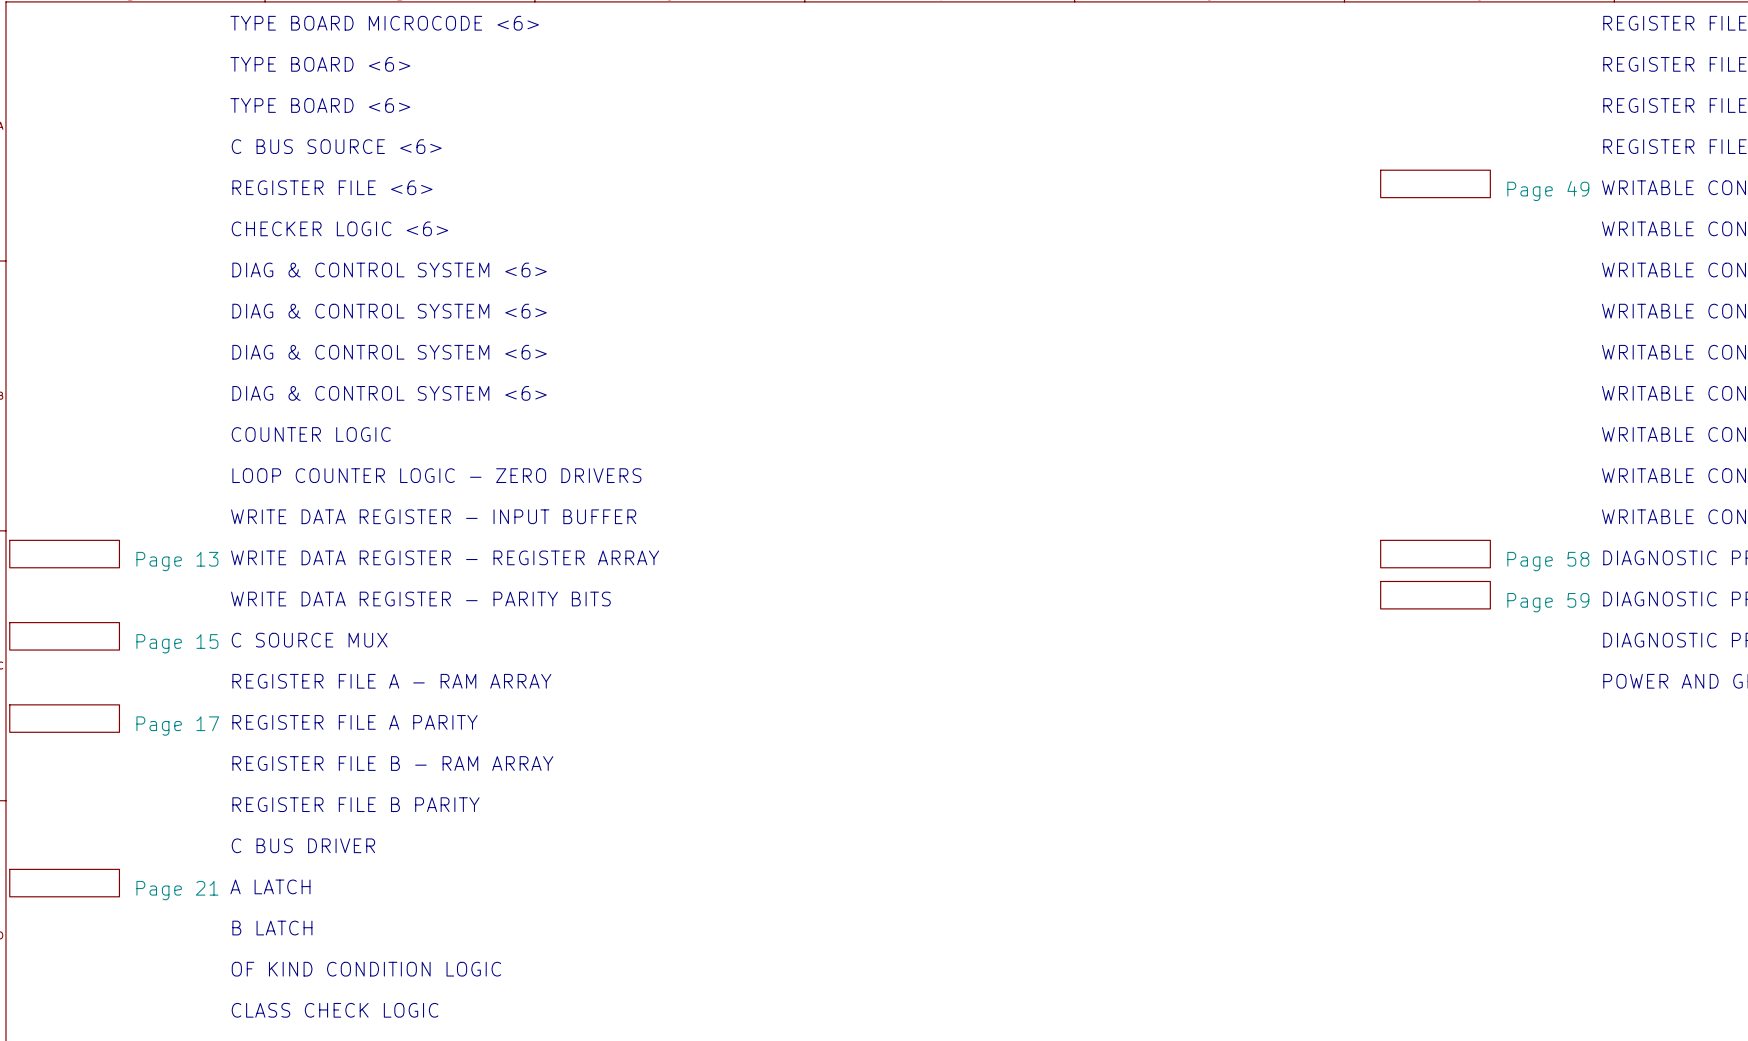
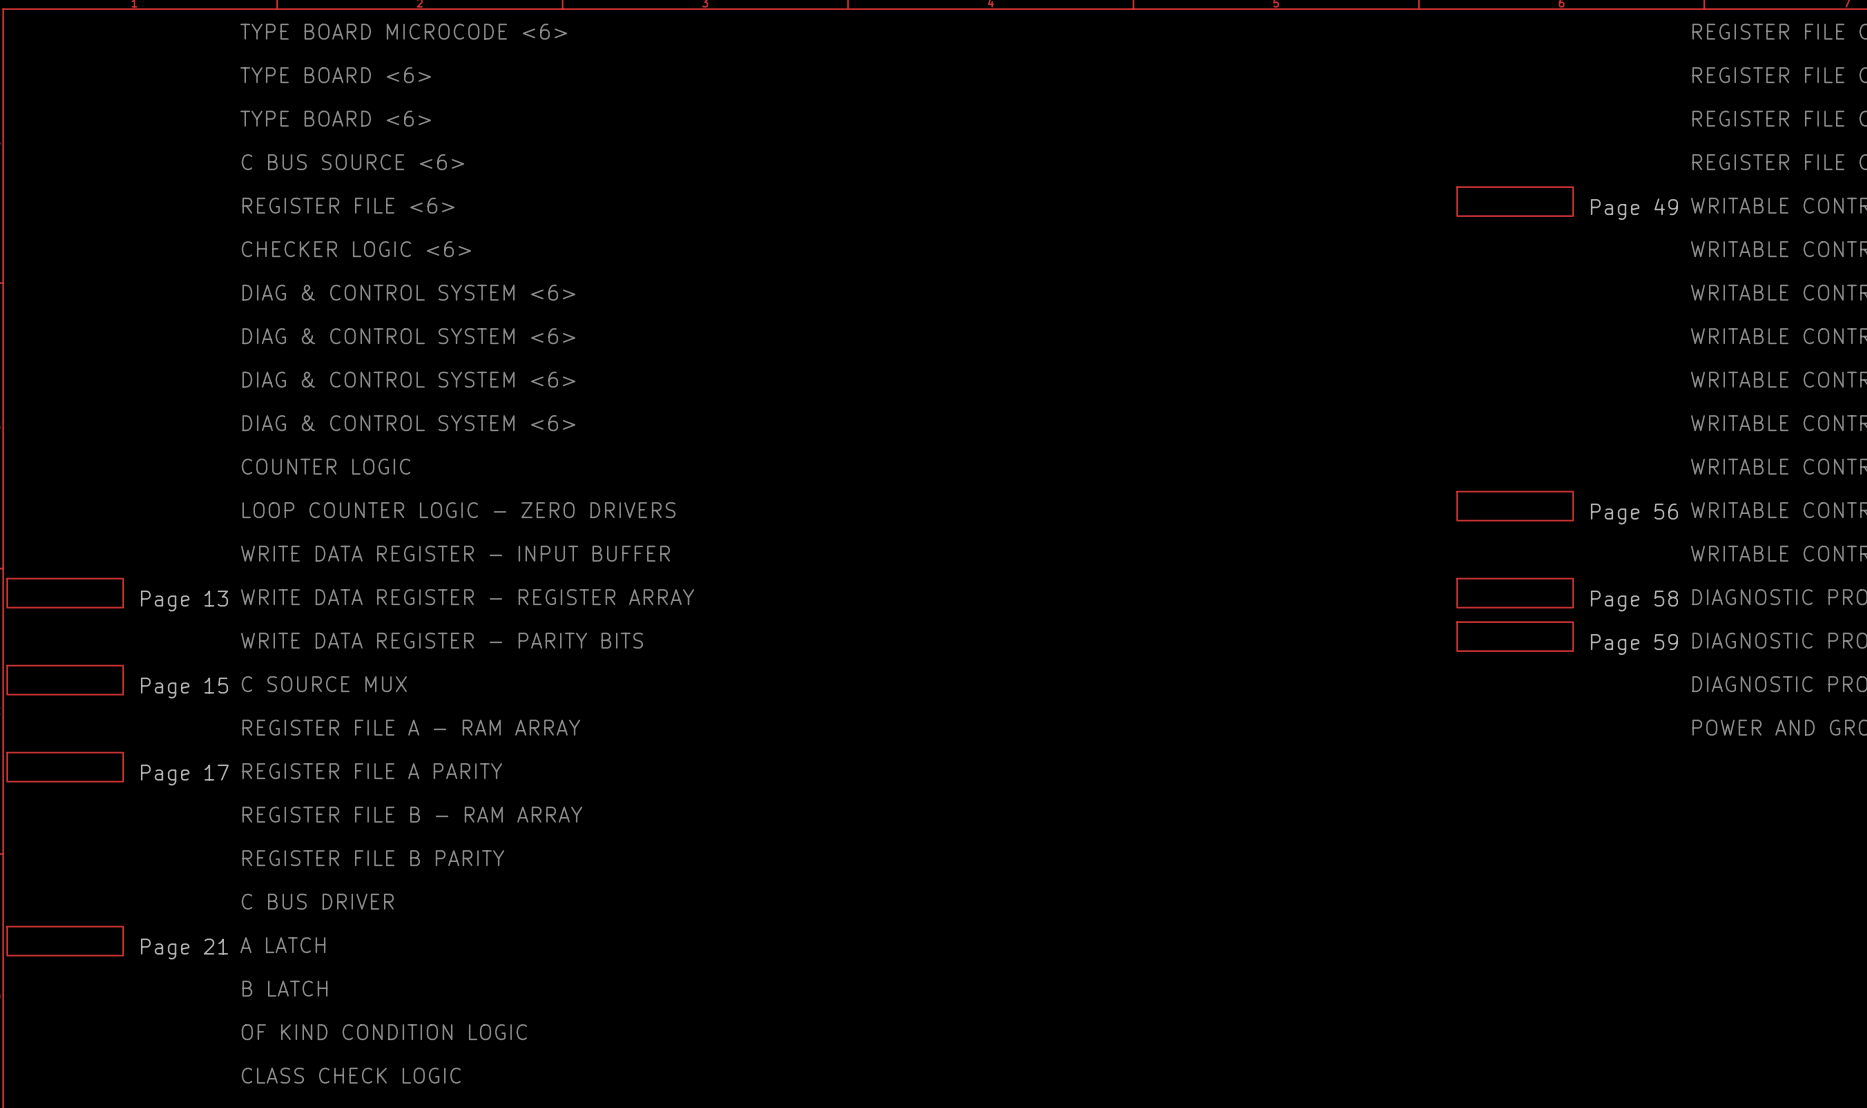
sheet Page 56: none -> (1515, 506)

